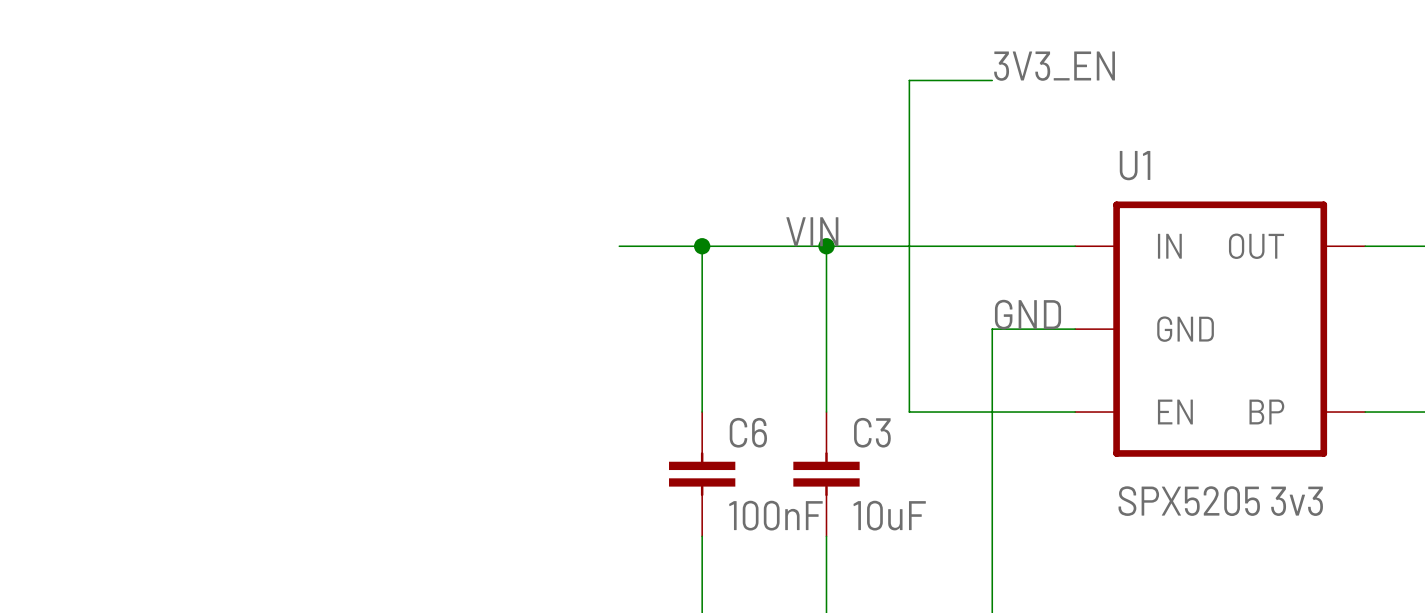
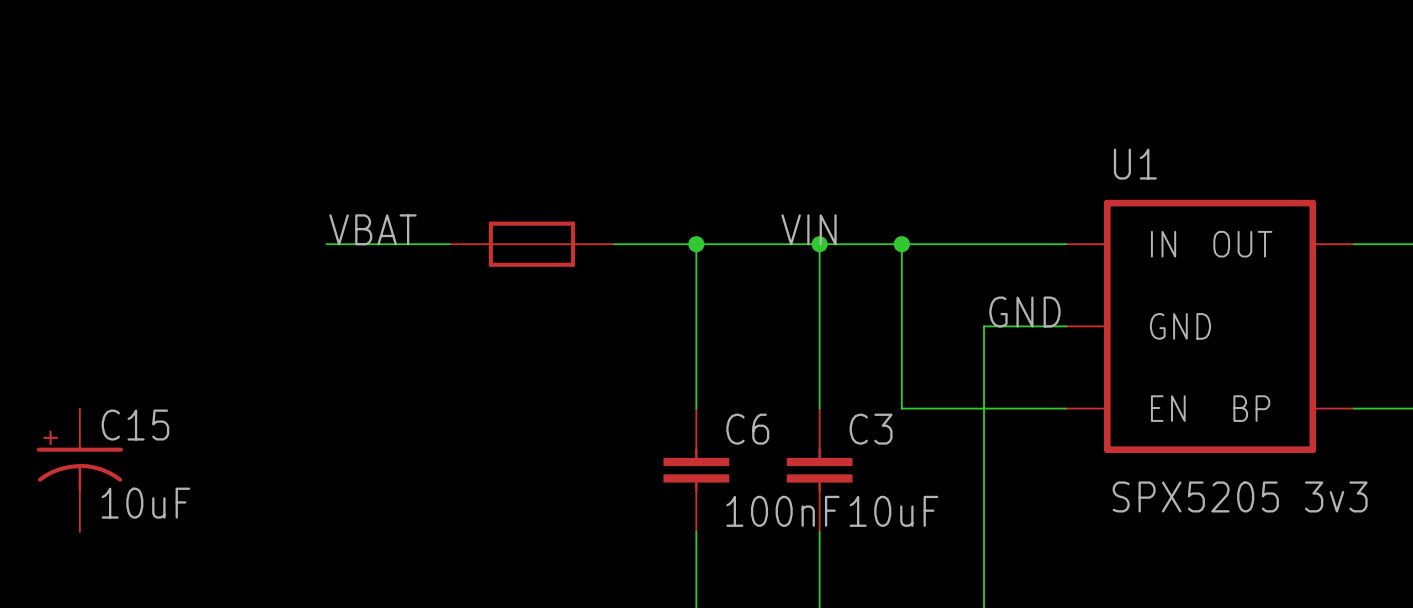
label: 3V3_EN (1054, 66) -> none
wire: (992, 80) (909, 80) (909, 246) -> none
label: none -> VBAT (372, 229)
wire: none -> (326, 244) (449, 244)
part: none -> (531, 244)
junction: none -> (901, 244)
C15: none -> 10uF (79, 470)

